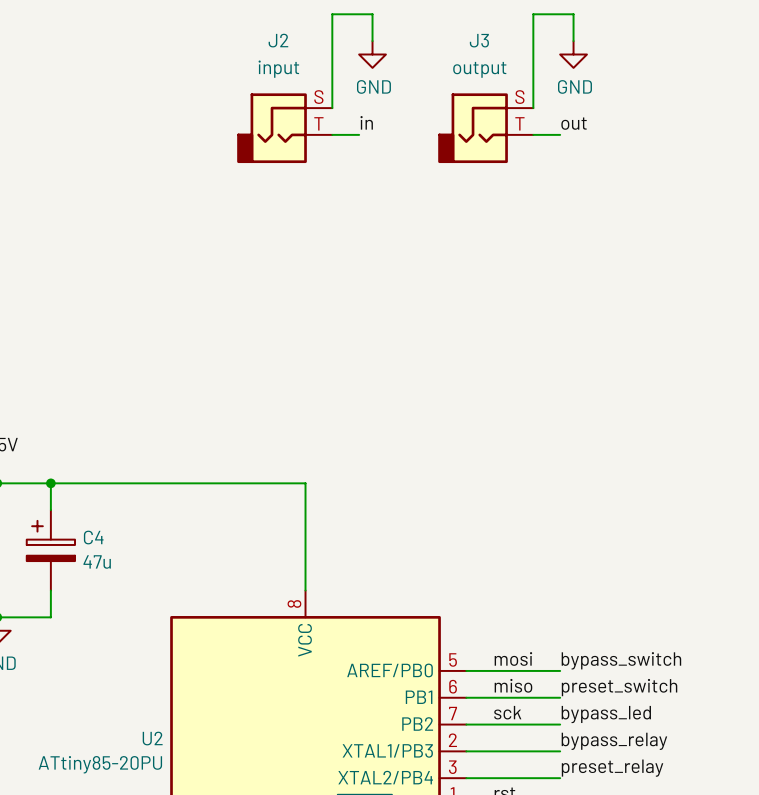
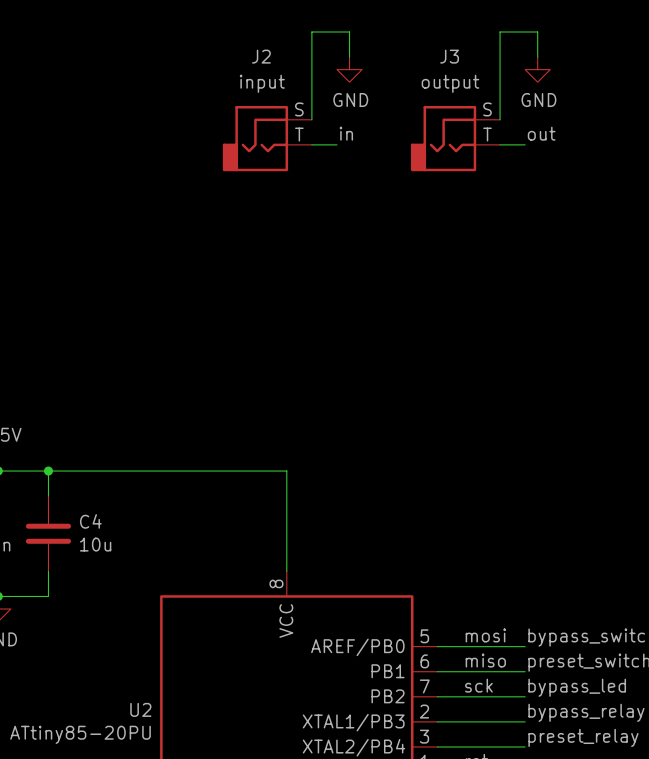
C4 symbol: [26, 510, 76, 591] -> [25, 496, 72, 572]
C4 value: 47u (97, 561) -> 10u (95, 544)

